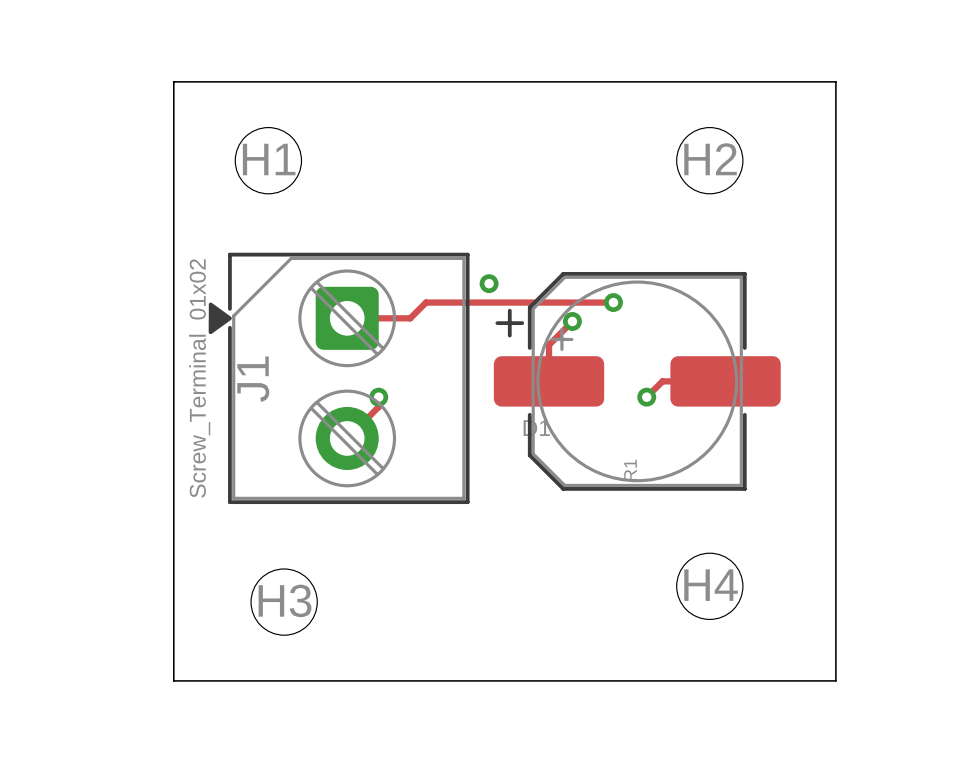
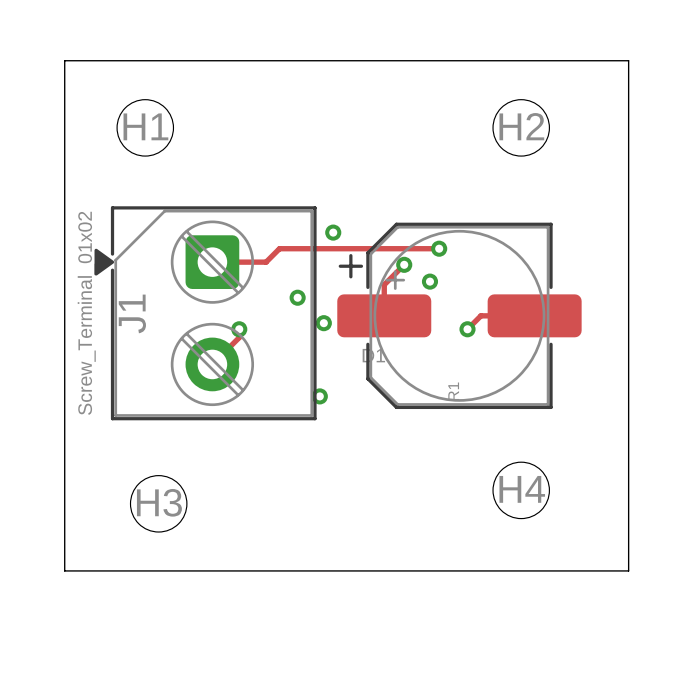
via: none -> (429, 281)
via: none -> (297, 297)
via: none -> (323, 323)
via: none -> (319, 396)

